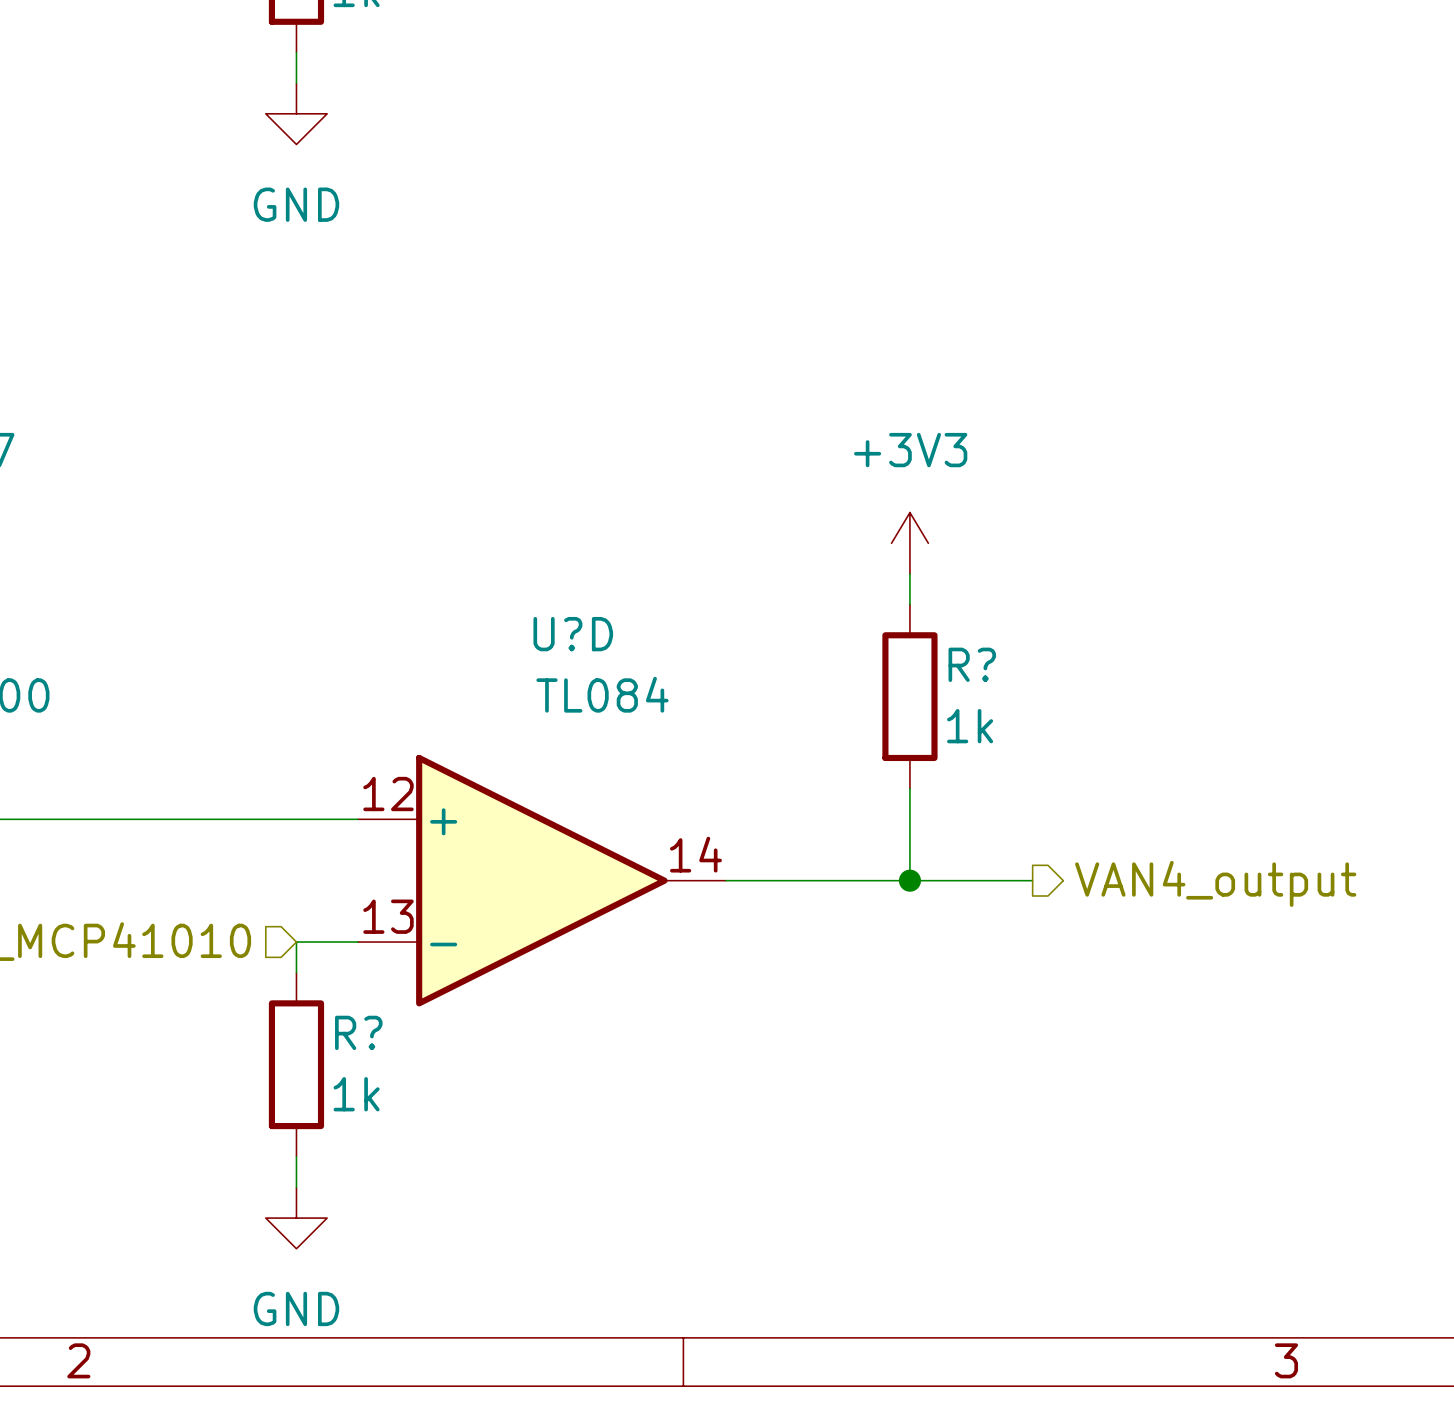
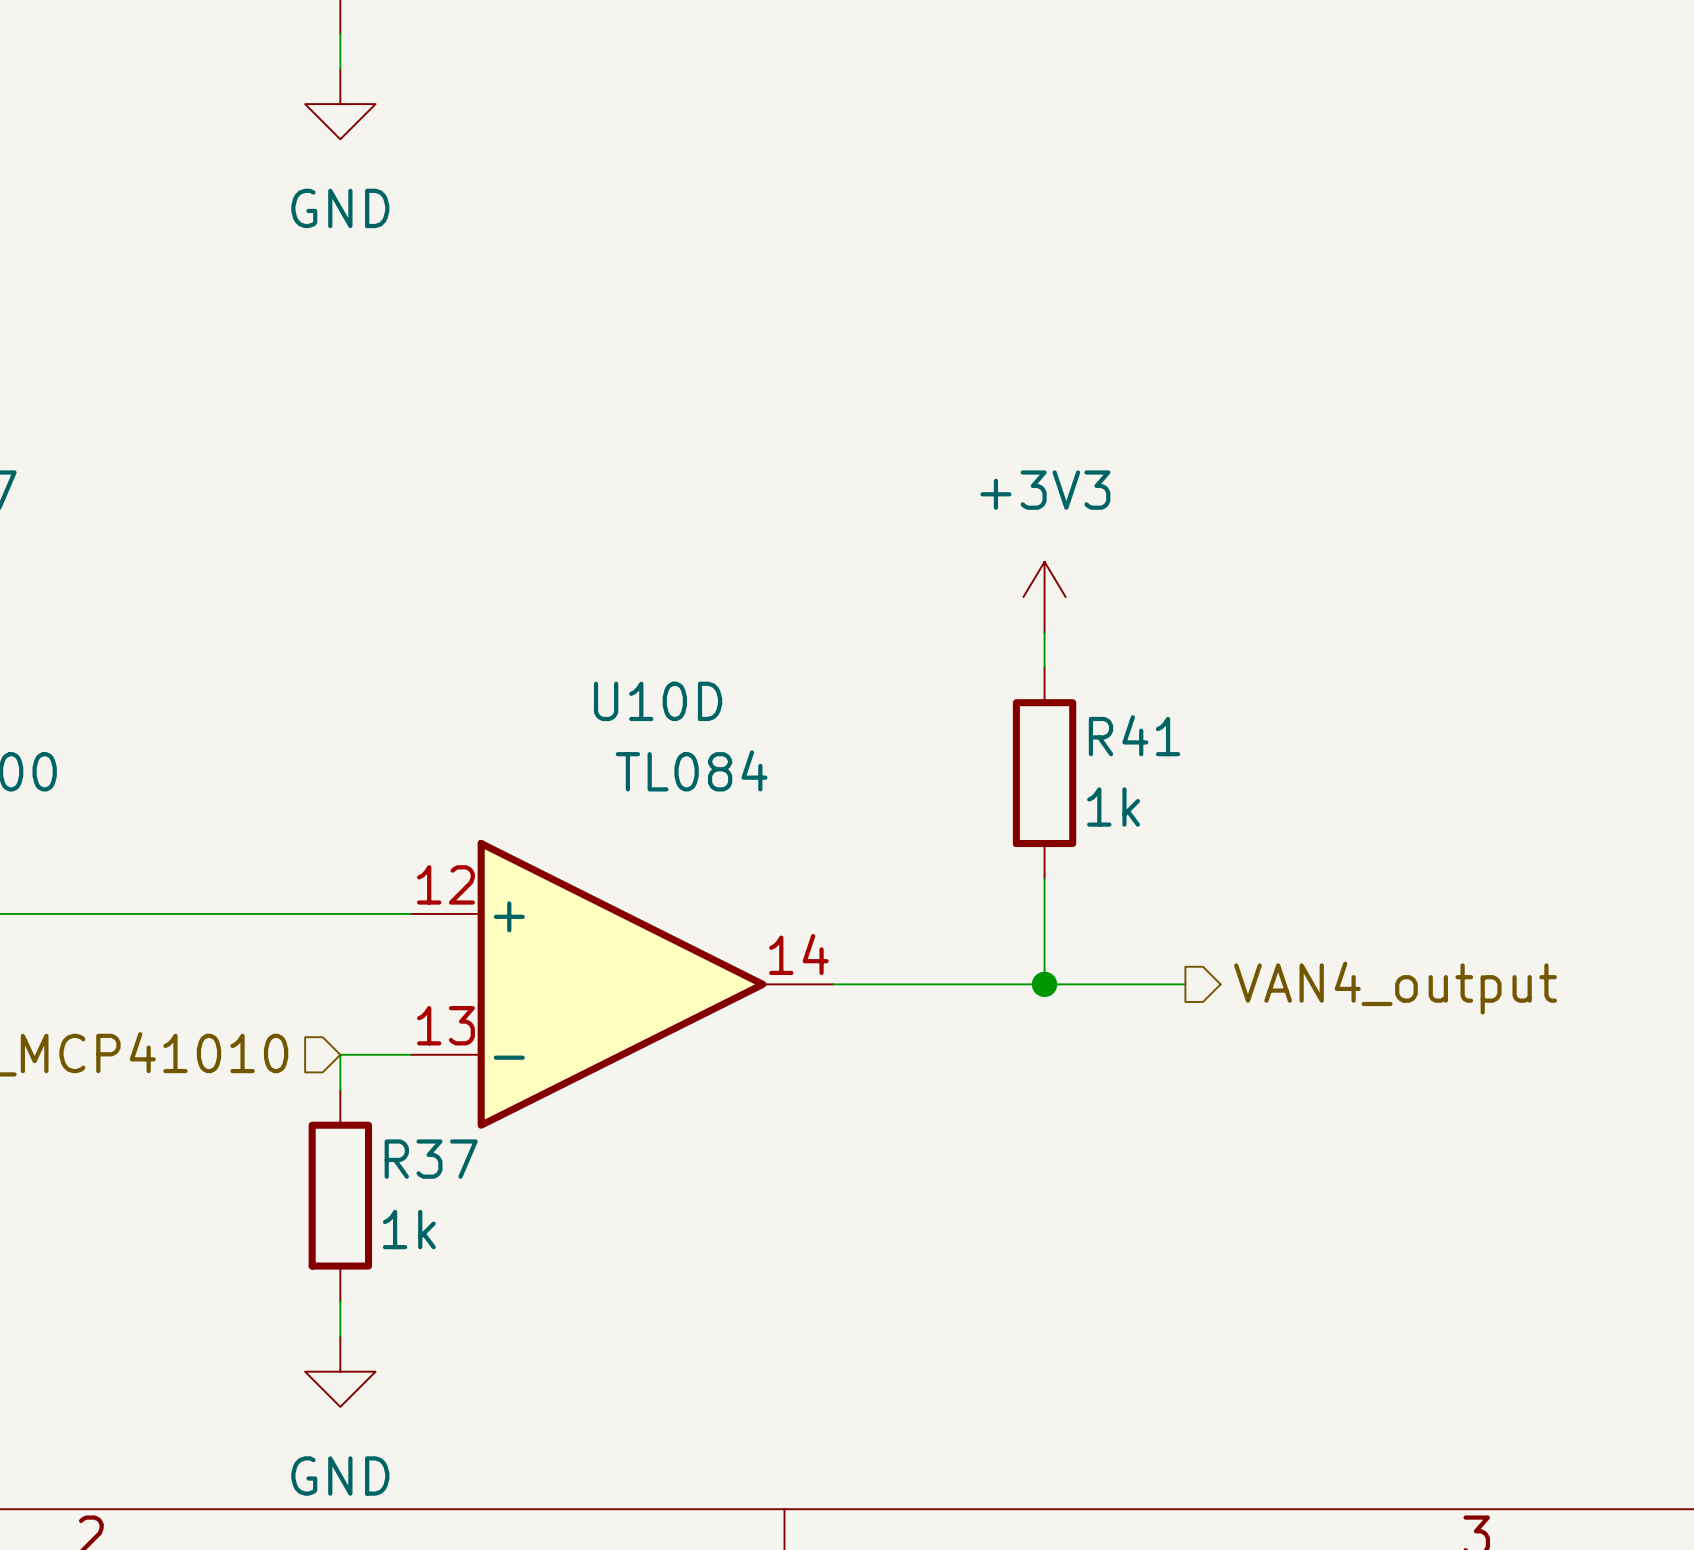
U?D name: U?D (573, 634) -> U10D (658, 701)
R? name: R? (972, 664) -> R41 (1134, 735)
R? name: R? (358, 1032) -> R37 (431, 1159)

